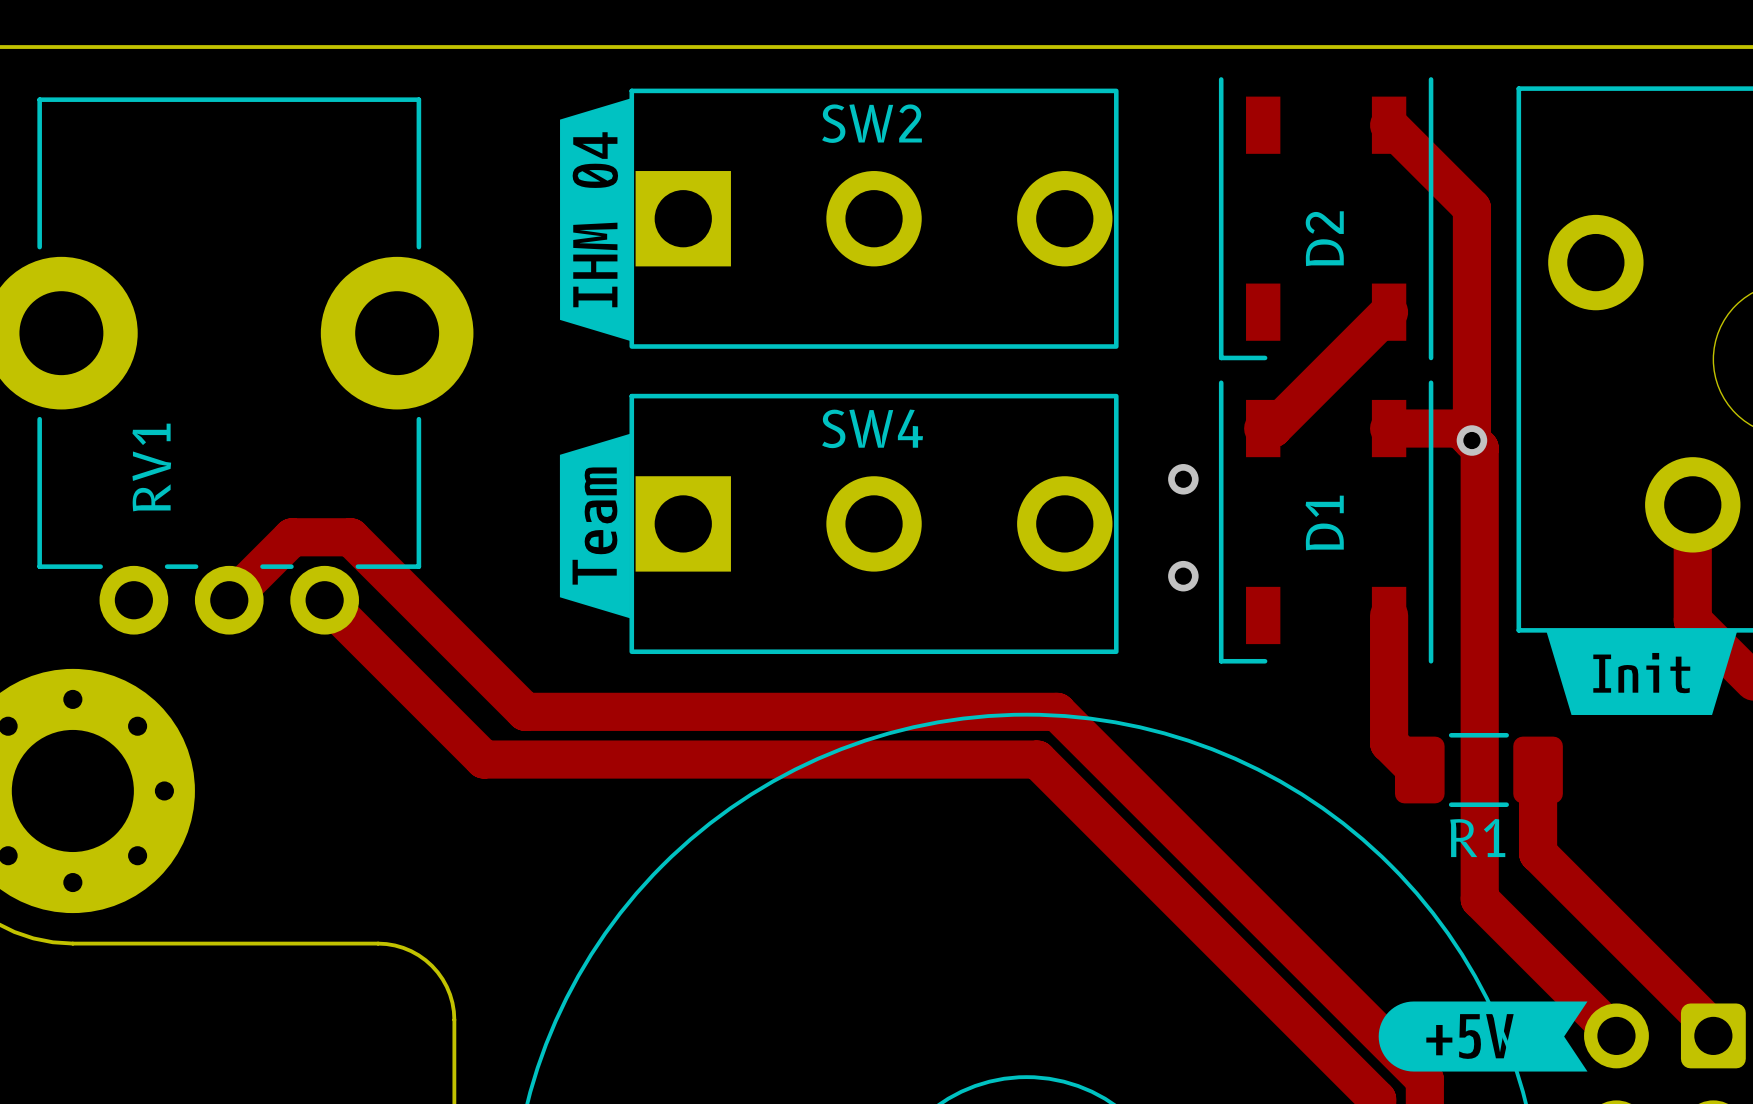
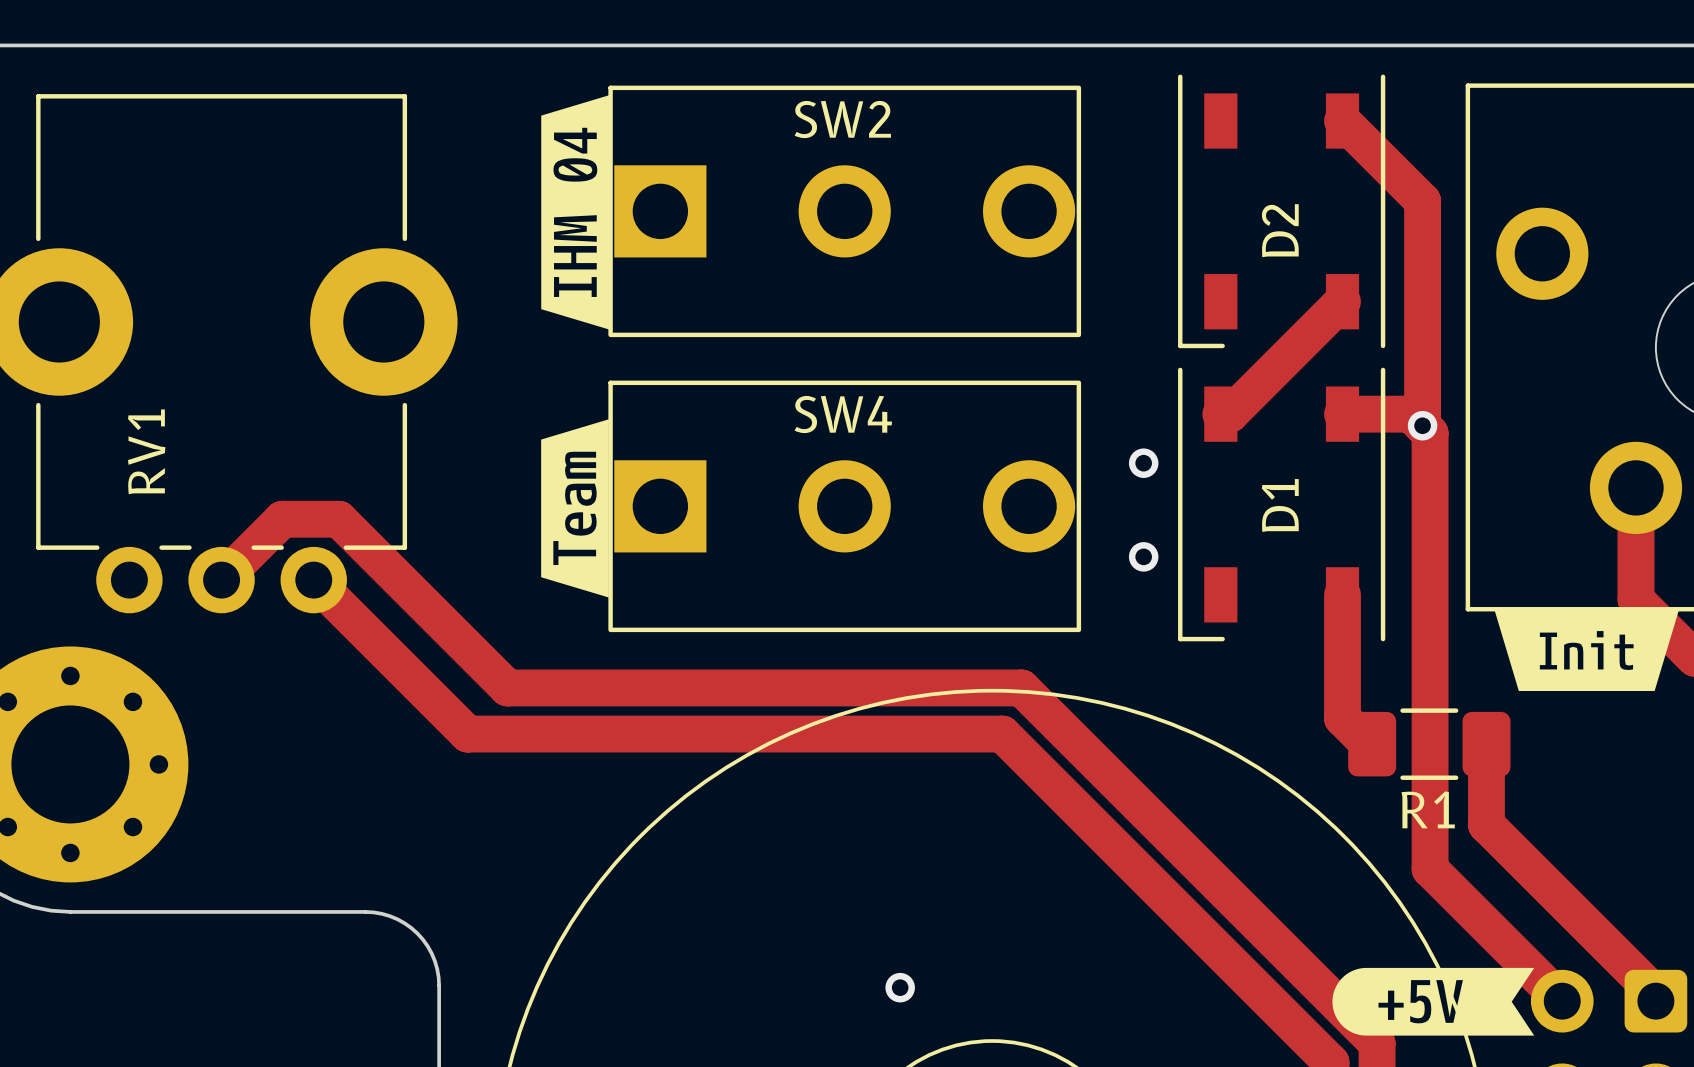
via: none -> (900, 987)

